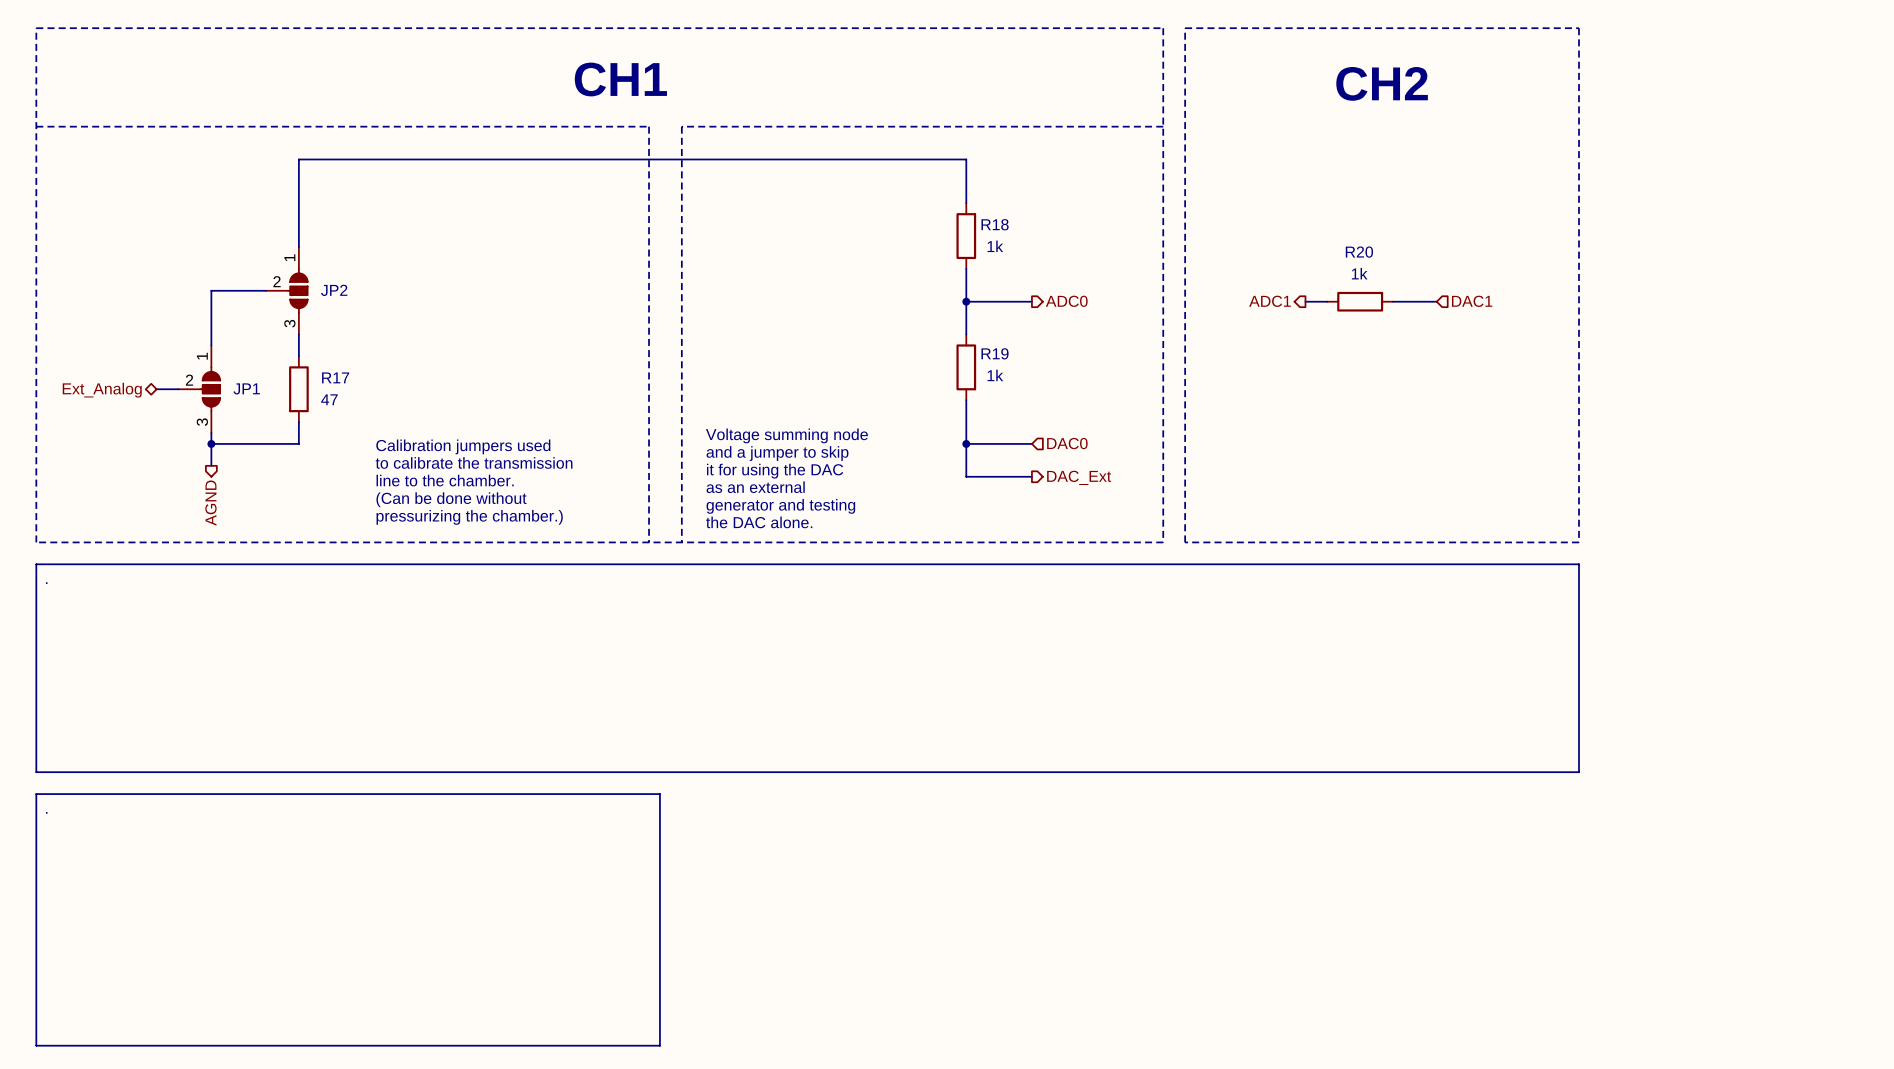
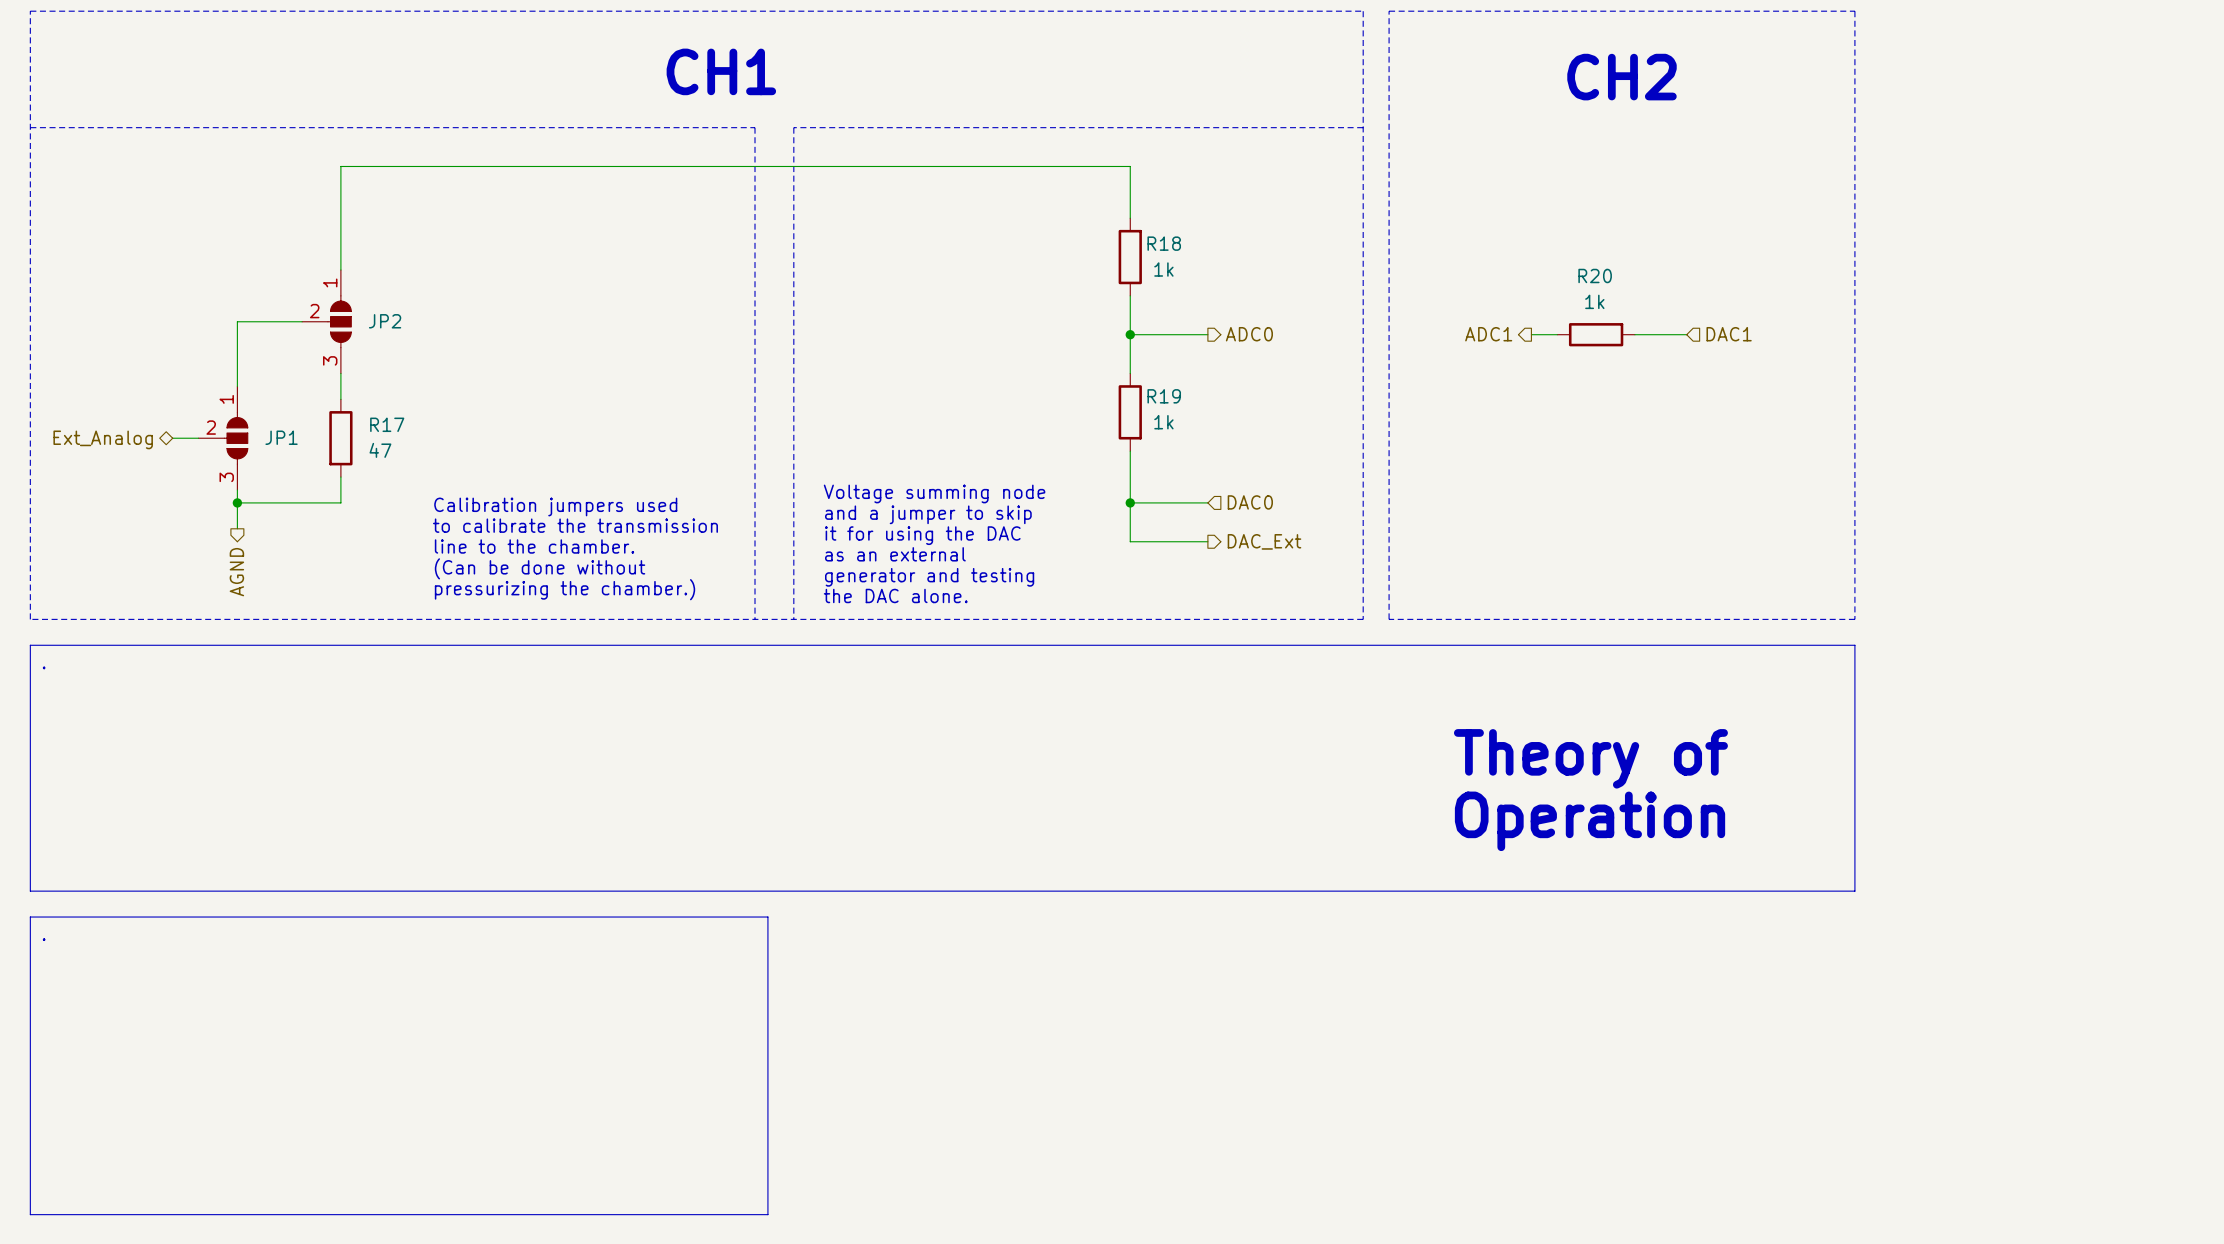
text: none -> Theory of (1590, 758)
text: none -> Operation (1590, 821)

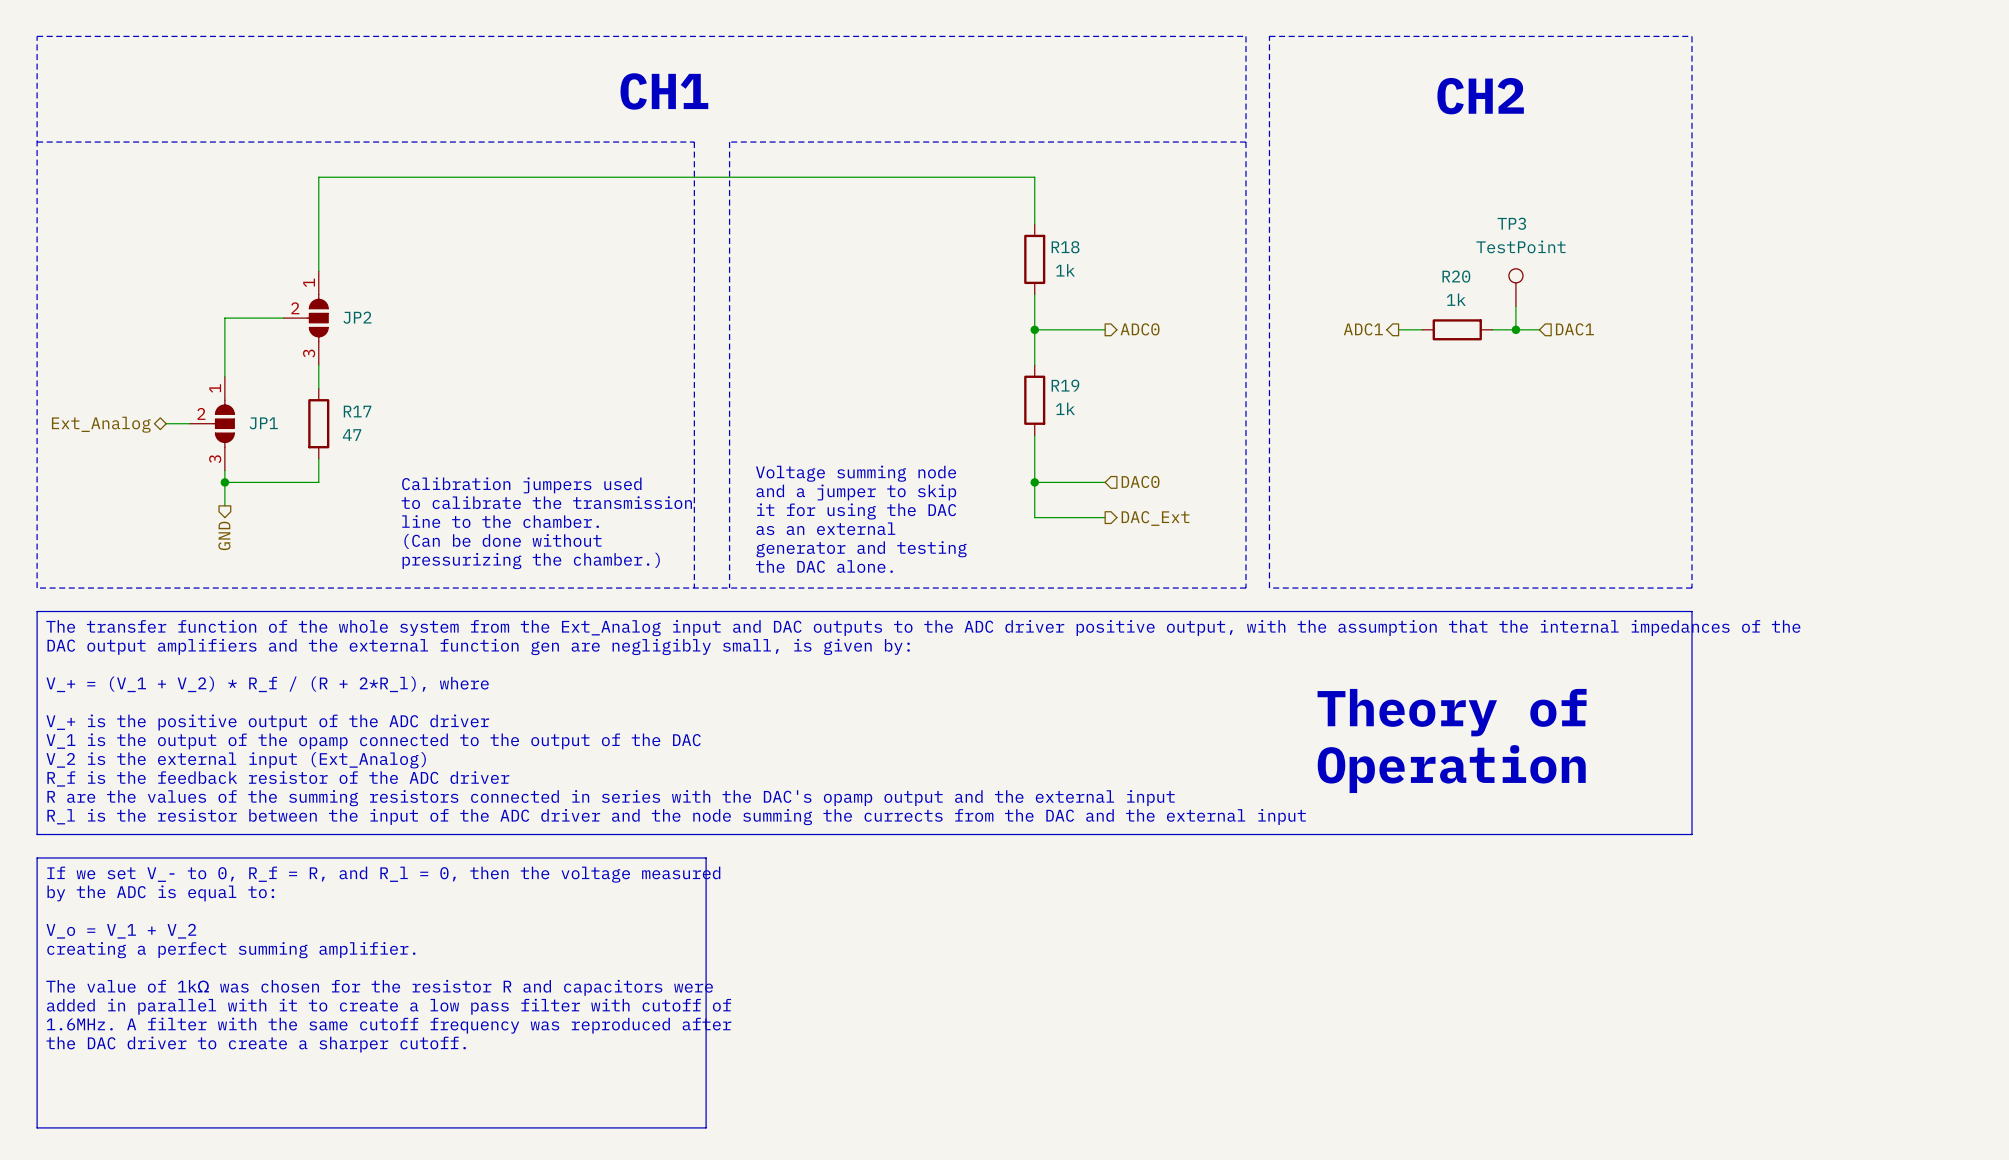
TP3: none -> TestPoint (1515, 287)
wire: none -> (1515, 306) (1515, 329)
junction: none -> (1515, 329)
hierarchical label: AGND (236, 572) -> GND (224, 535)
text: . (44, 667) -> The transfer function of the whole system from the Ext_Analog input and DAC outputs to the ADC driver positive output, with the assumption that the internal impedances of the (923, 628)
text: none -> DAC output amplifiers and the external function gen are negligibly small, is given by: (478, 647)
text: none -> V_+ = (V_1 + V_2) * R_f / (R + 2*R_l), where (267, 684)
text: none -> V_+ is the positive output of the ADC driver (267, 722)
text: none -> V_1 is the output of the opamp connected to the output of the DAC (373, 741)
text: none -> V_2 is the external input (Ext_Analog) (236, 760)
text: none -> R_f is the feedback resistor of the ADC driver (278, 778)
text: none -> R are the values of the summing resistors connected in series with the DAC's opamp output and the external input (611, 798)
text: none -> R_l is the resistor between the input of the ADC driver and the node summing the currects from the DAC and the external input (676, 817)
text: . (44, 939) -> If we set V_- to 0, R_f = R, and R_l = 0, then the voltage measured (383, 874)
text: none -> by the ADC is equal to: (160, 893)
text: none -> V_o = V_1 + V_2 (121, 931)
text: none -> creating a perfect summing amplifier. (231, 950)
text: none -> The value of 1kΩ was chosen for the resistor R and capacitors were (379, 987)
text: none -> added in parallel with it to create a low pass filter with cutoff of (389, 1006)
text: none -> 1.6MHz. A filter with the same cutoff frequency was reproduced after (389, 1025)
text: none -> the DAC driver to create a sharper cutoff. (256, 1044)

